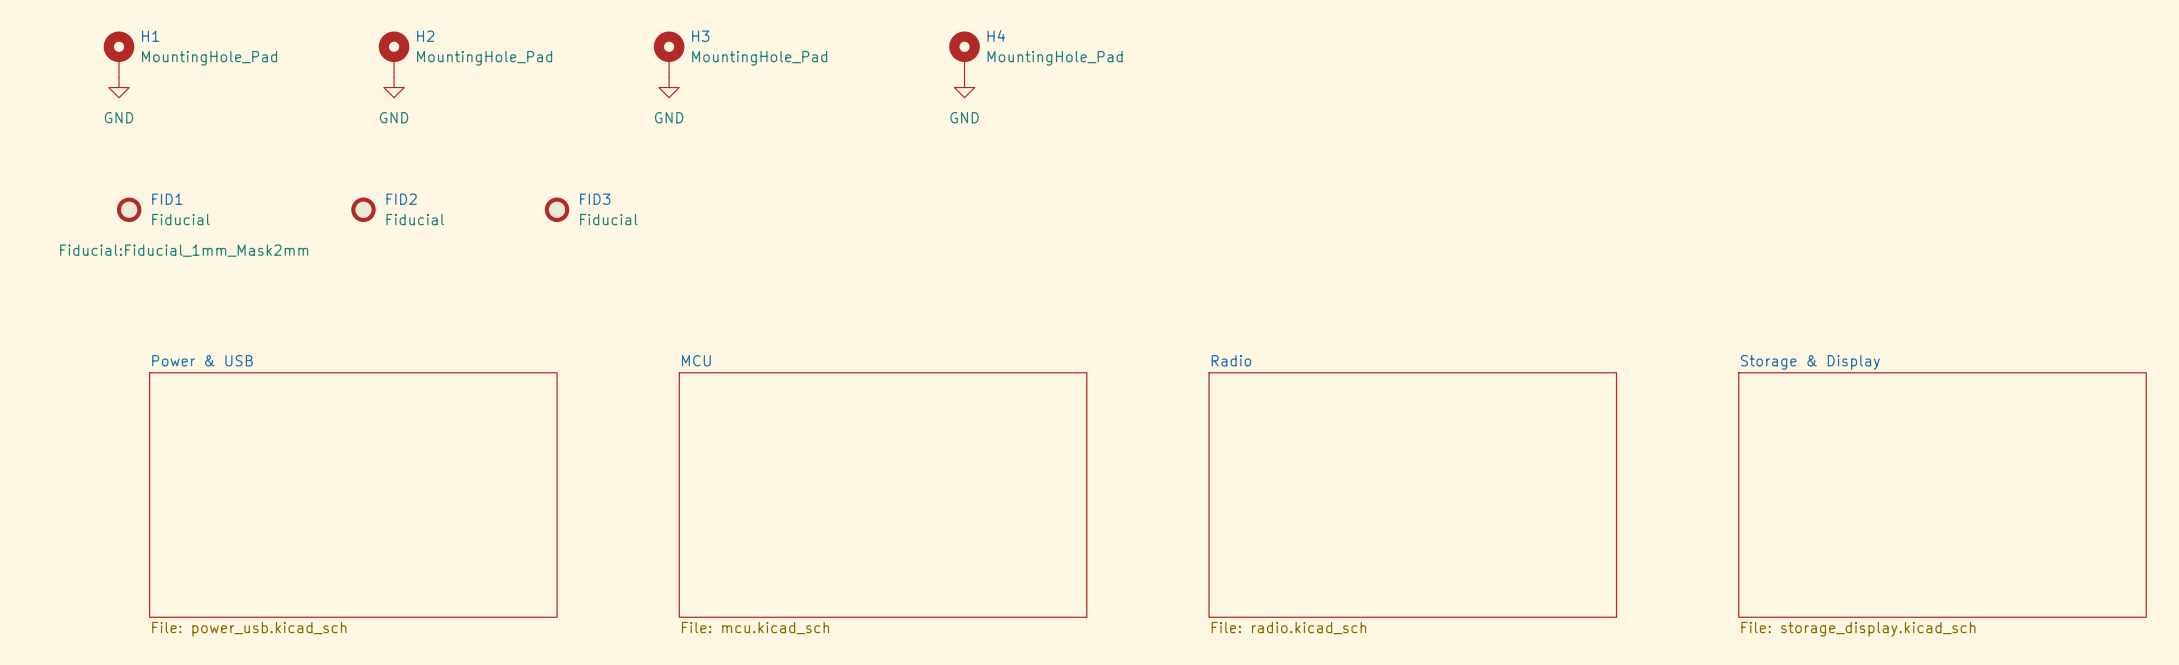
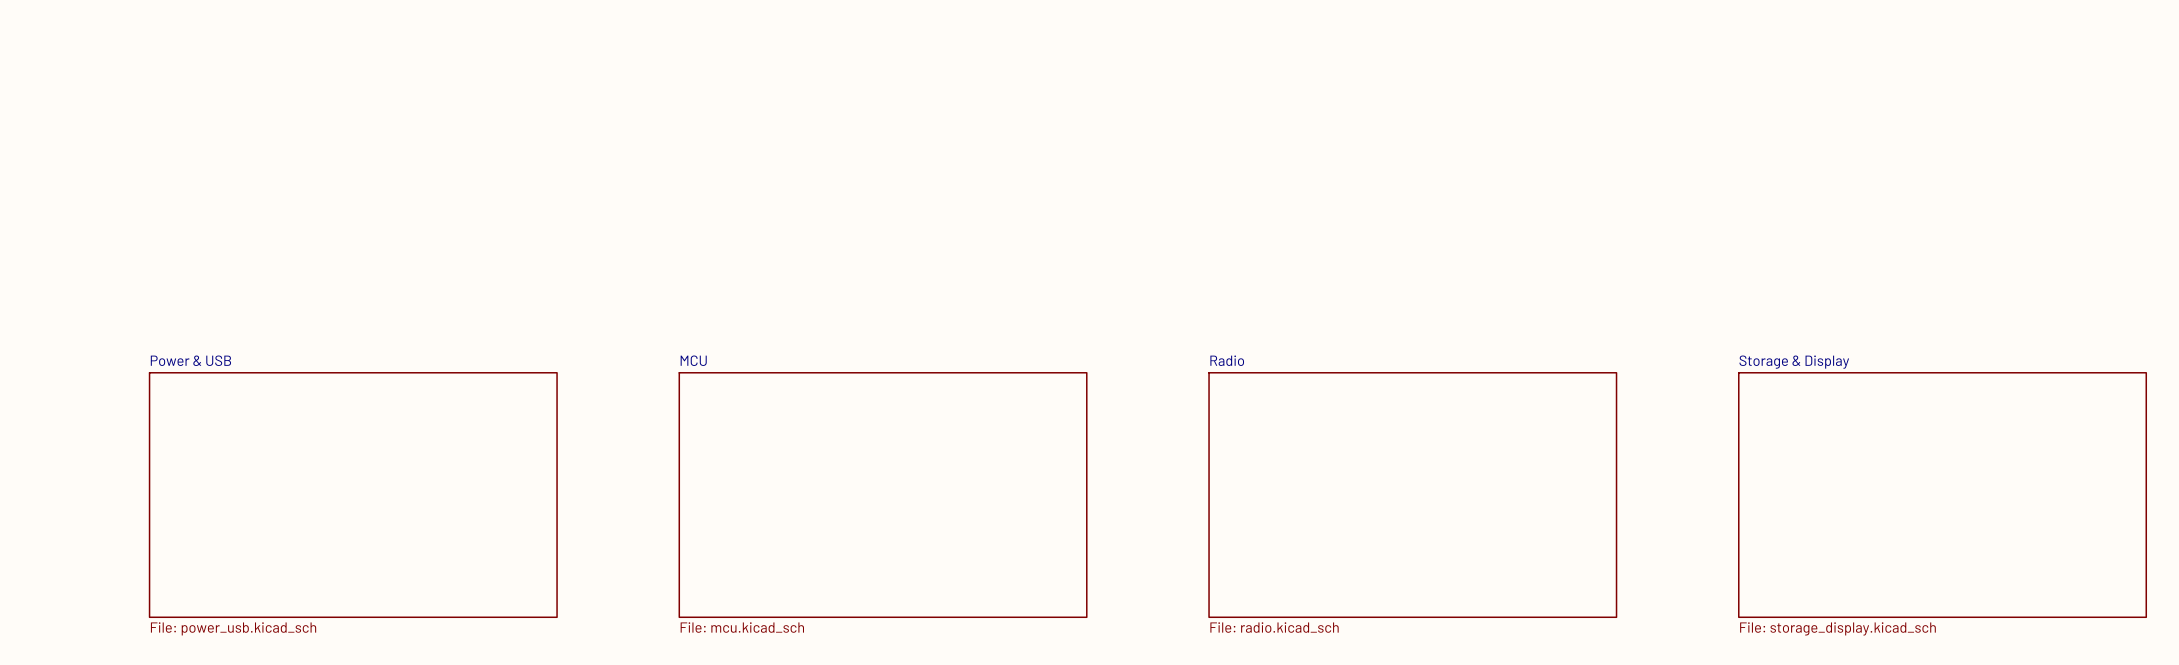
H1: MountingHole_Pad (118, 54) -> none
H2: MountingHole_Pad (394, 54) -> none
H3: MountingHole_Pad (669, 54) -> none
H4: MountingHole_Pad (964, 54) -> none
power symbol: GND (118, 87) -> none
power symbol: GND (394, 87) -> none
power symbol: GND (669, 87) -> none
power symbol: GND (964, 87) -> none
FID1: Fiducial (129, 209) -> none
FID2: Fiducial (363, 209) -> none
FID3: Fiducial (557, 209) -> none

